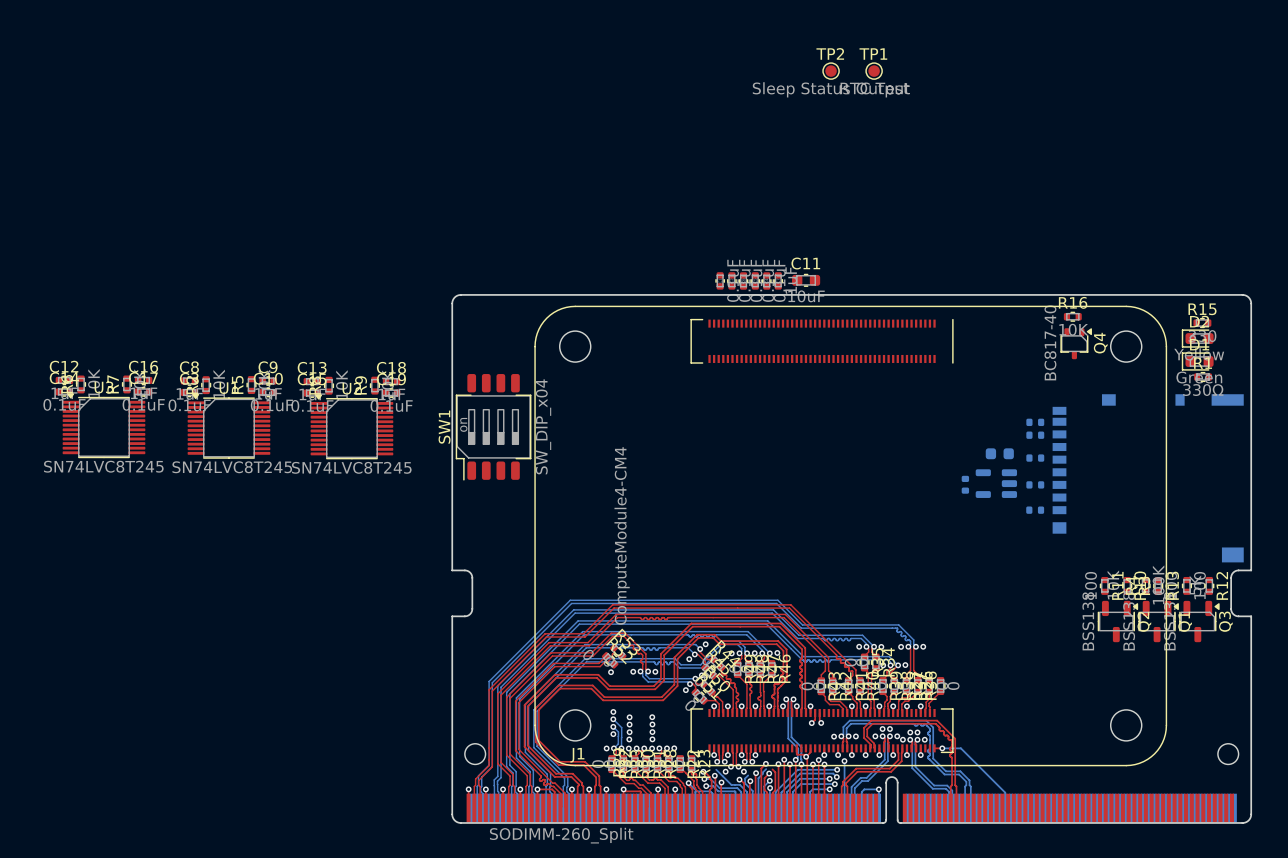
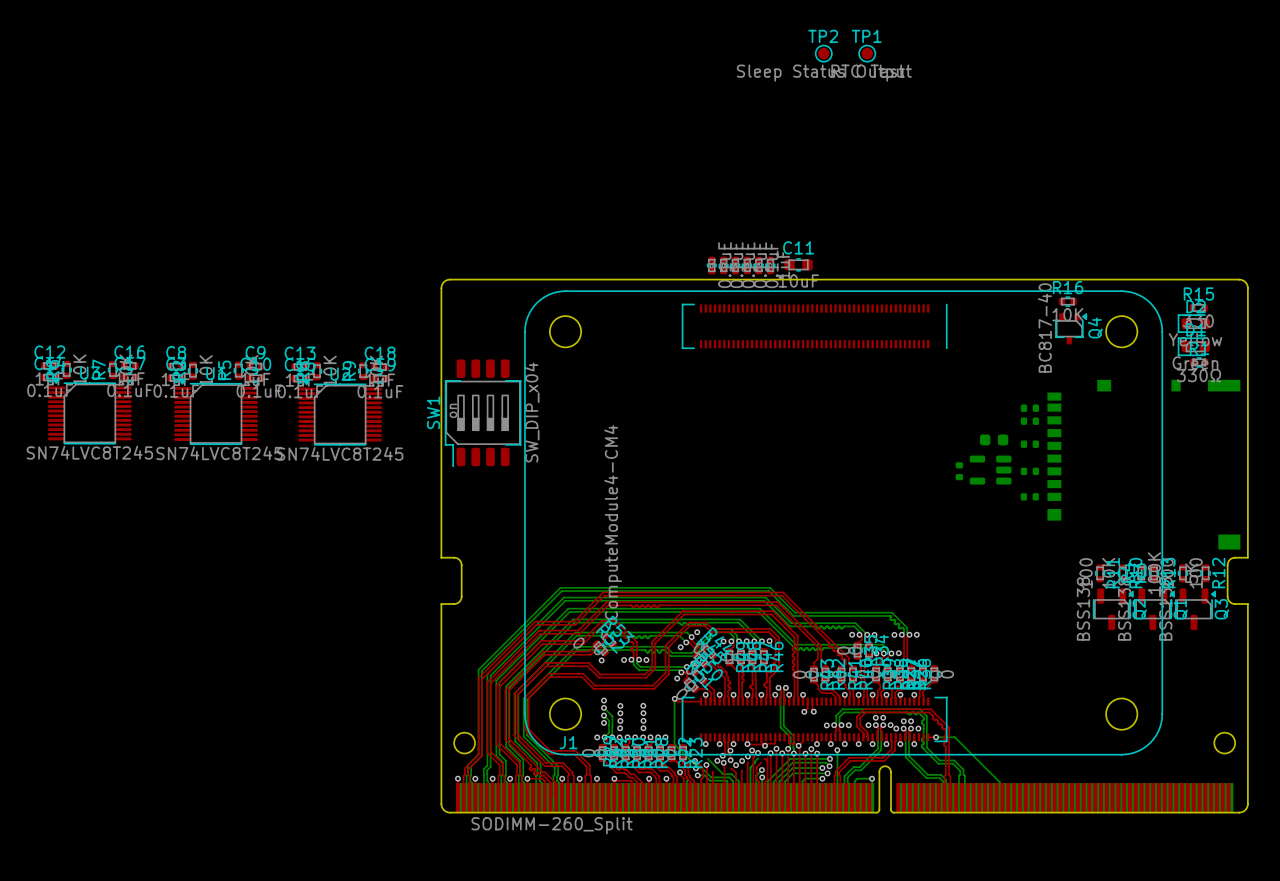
top track: none -> (674, 698) (677, 701) (701, 701)
bottom track: none -> (674, 698) (674, 744) (694, 763) (698, 763) (702, 768)
via: none -> (674, 698)
top track: (718, 748) (719, 759) (717, 761) -> none
top track: (723, 748) (722, 759) (724, 761) -> none
top track: (746, 748) (746, 759) (744, 761) -> none
top track: (750, 748) (750, 759) (752, 761) -> none
top track: none -> (761, 737) (761, 742) (765, 745) (767, 743) (774, 743) (775, 737)
top track: none -> (747, 744) (763, 744)
via: none -> (765, 745)
via: (717, 761) -> none
via: (724, 761) -> none
via: none -> (730, 750)
via: (744, 761) -> none
via: (752, 761) -> none
via: none -> (752, 750)
via: (738, 766) -> none
via: none -> (747, 756)
via: none -> (730, 760)
via: (743, 771) -> none
via: none -> (742, 761)
top track: none -> (723, 762) (724, 797)
via: none -> (723, 762)
via: (756, 773) -> none
via: (769, 773) -> none
via: none -> (736, 765)
bottom track: (748, 775) (745, 778) (745, 783) (752, 791) (752, 808) -> none
via: (739, 779) -> none
via: (750, 781) -> none
via: (721, 782) -> none
bottom track: (688, 783) (695, 791) (710, 791) (712, 793) (712, 808) -> none

